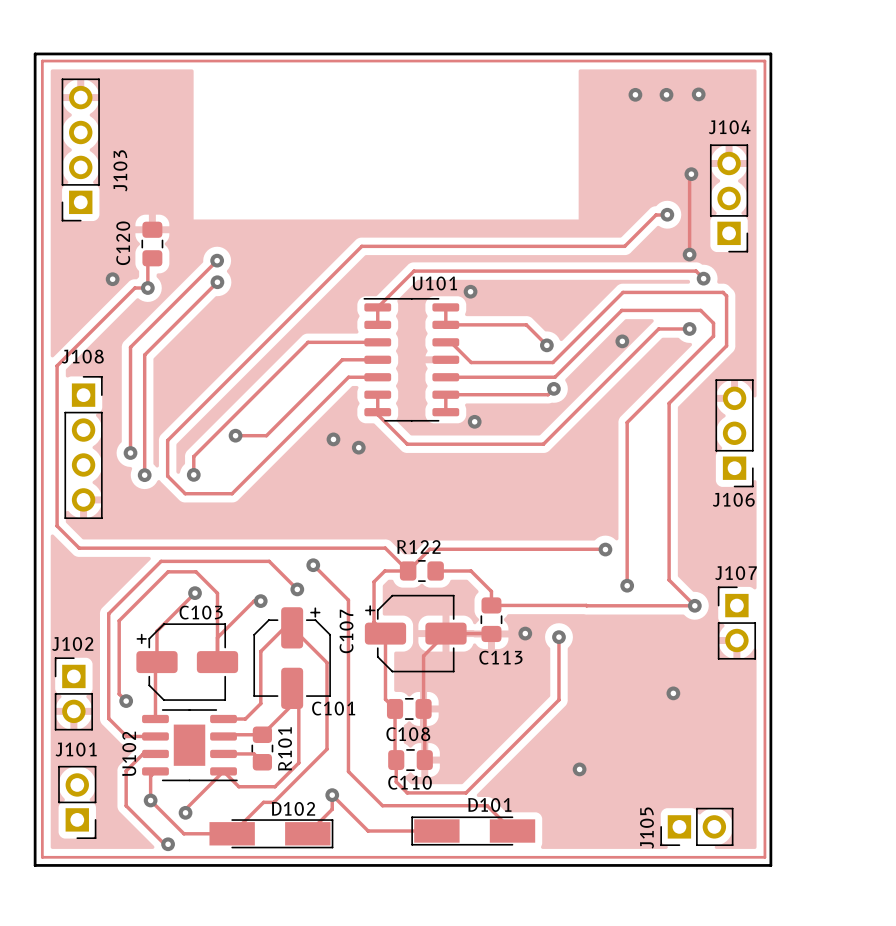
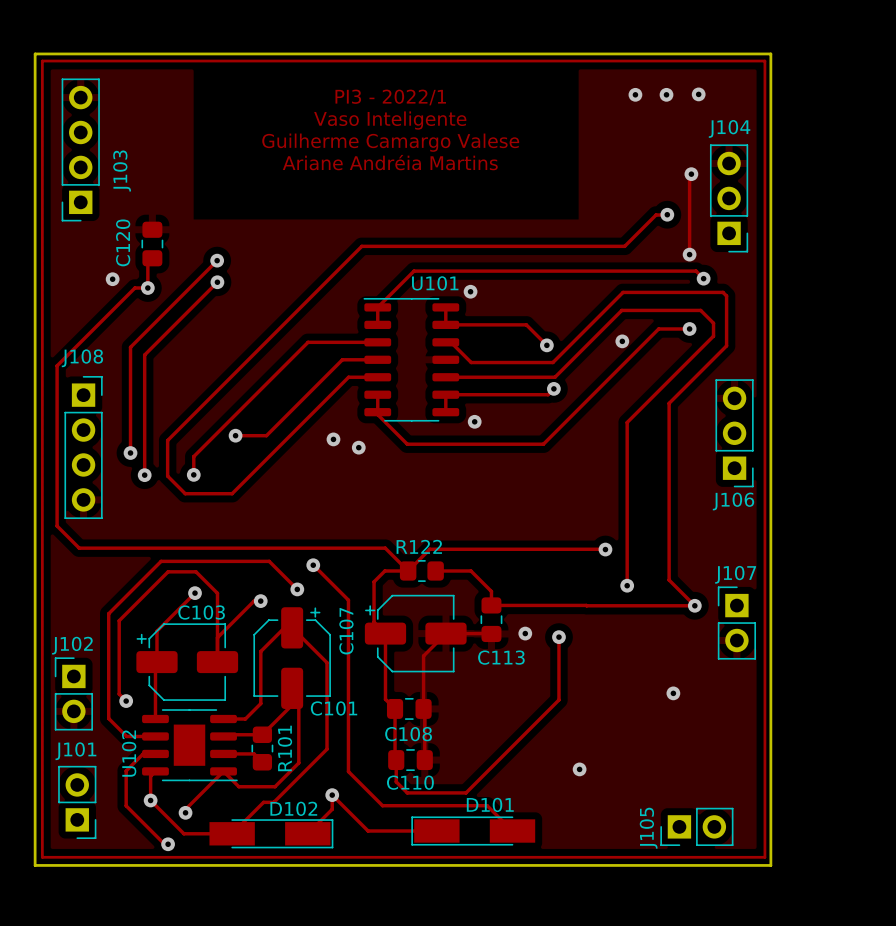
text: none -> PI3 - 2022/1 (390, 97)
text: none -> Vaso Inteligente (390, 120)
text: none -> Guilherme Camargo Valese (390, 142)
text: none -> Ariane Andréia Martins (390, 162)

